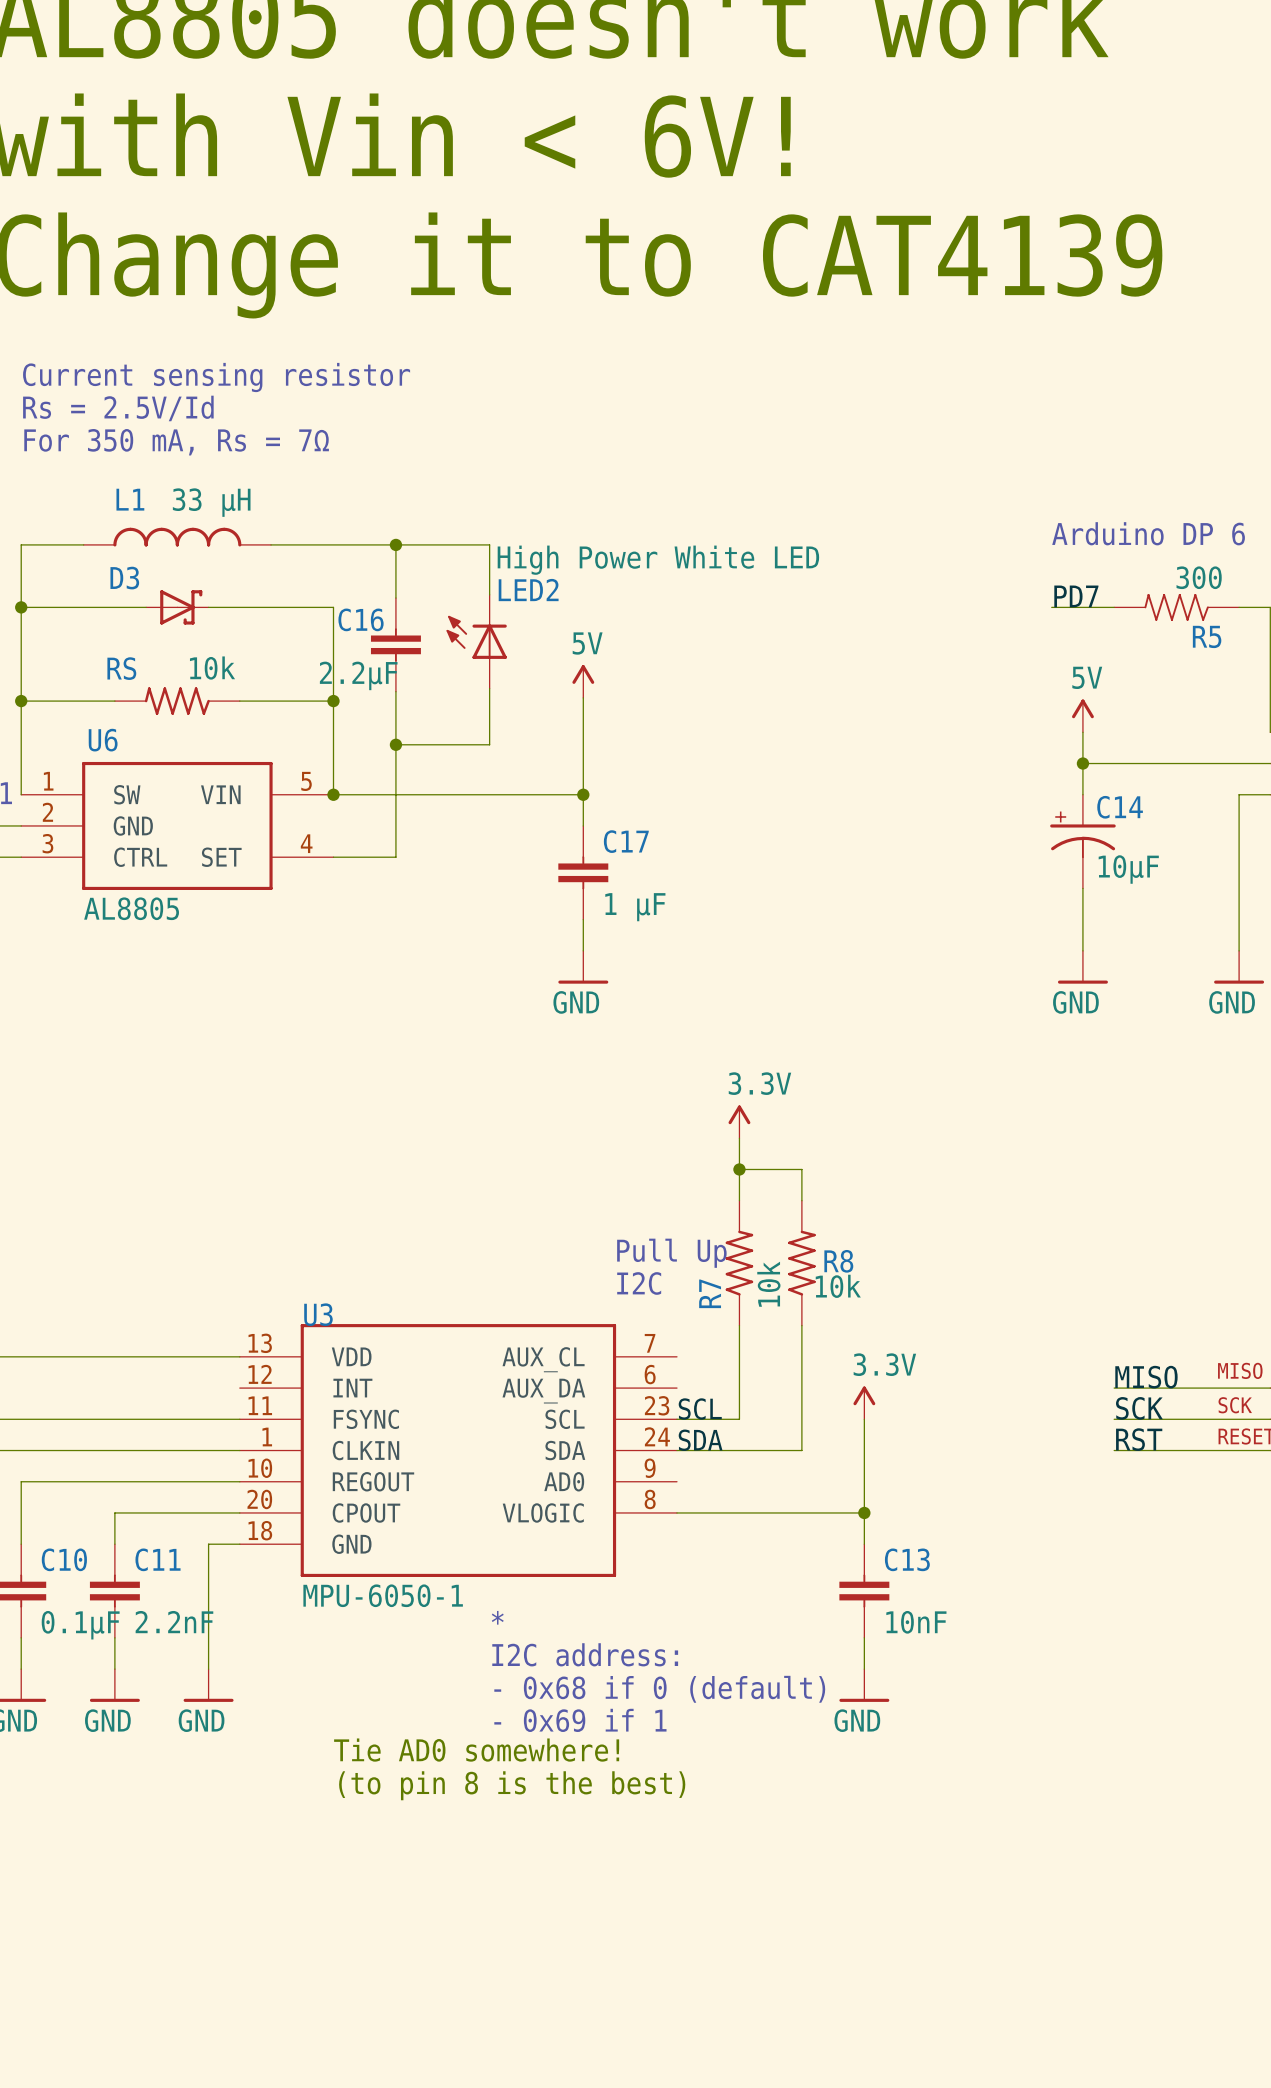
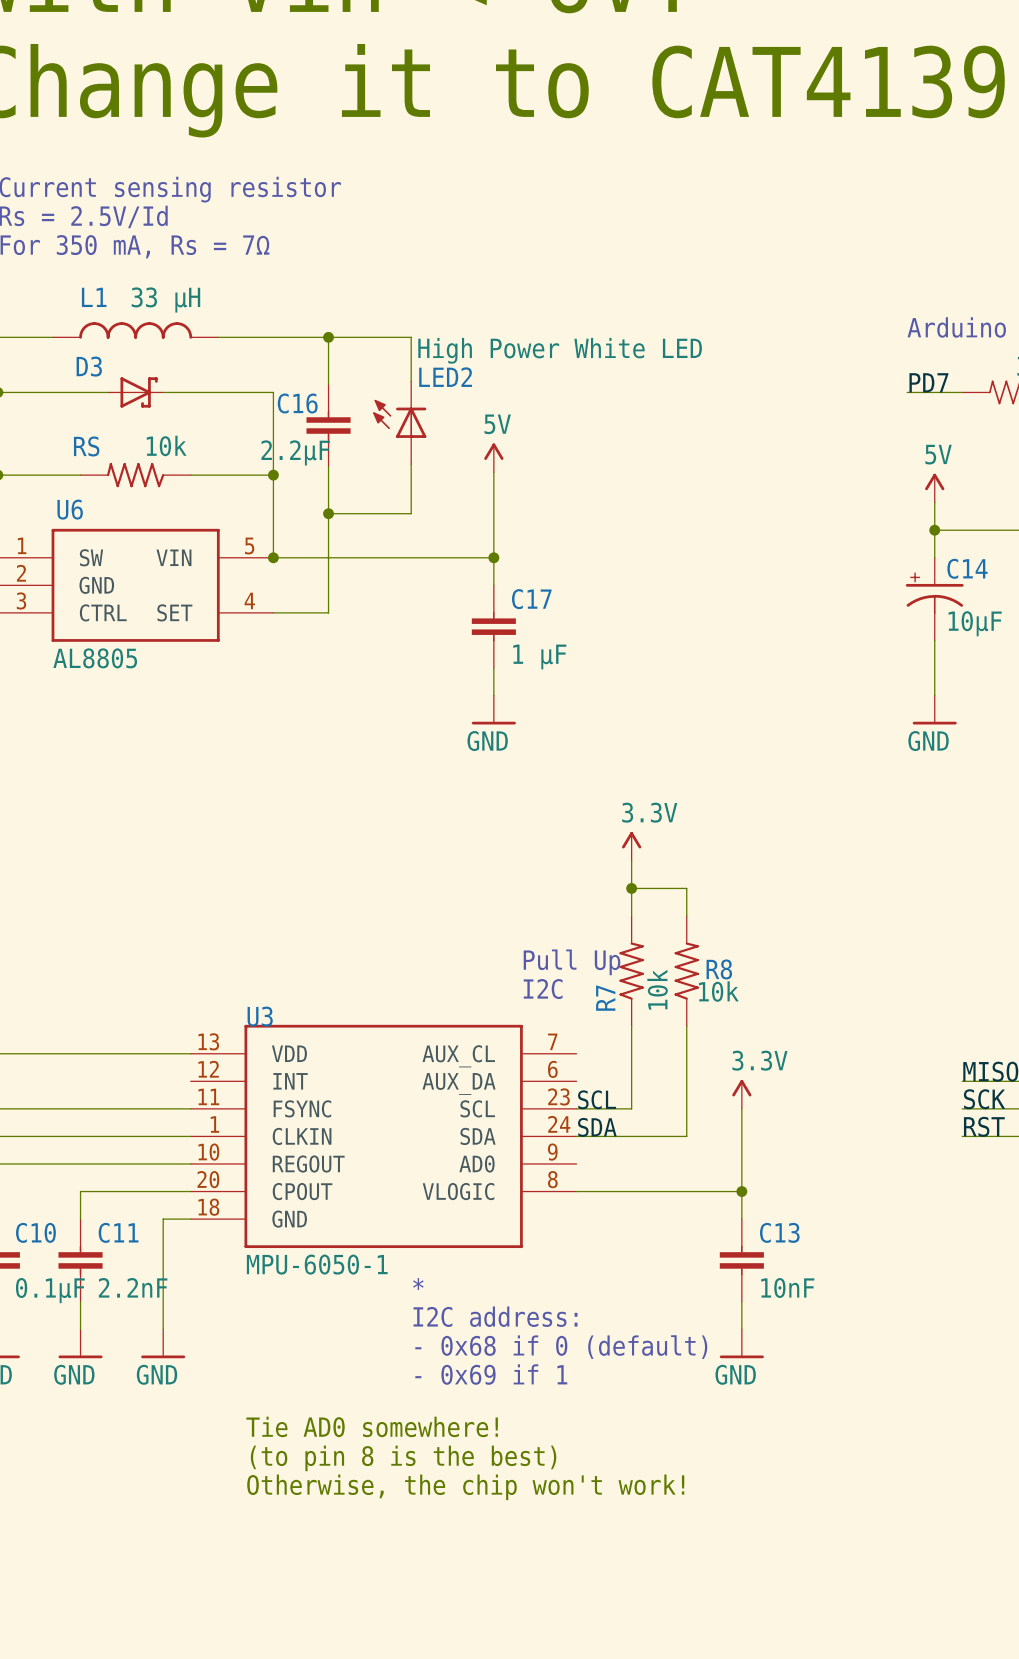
text position: Tie AD0 somewhere! (476, 1750) -> Tie AD0 somewhere! (372, 1426)
text position: (to pin 8 is the best) (512, 1785) -> (to pin 8 is the best) (403, 1458)
text: none -> Otherwise, the chip won't work! (465, 1487)

